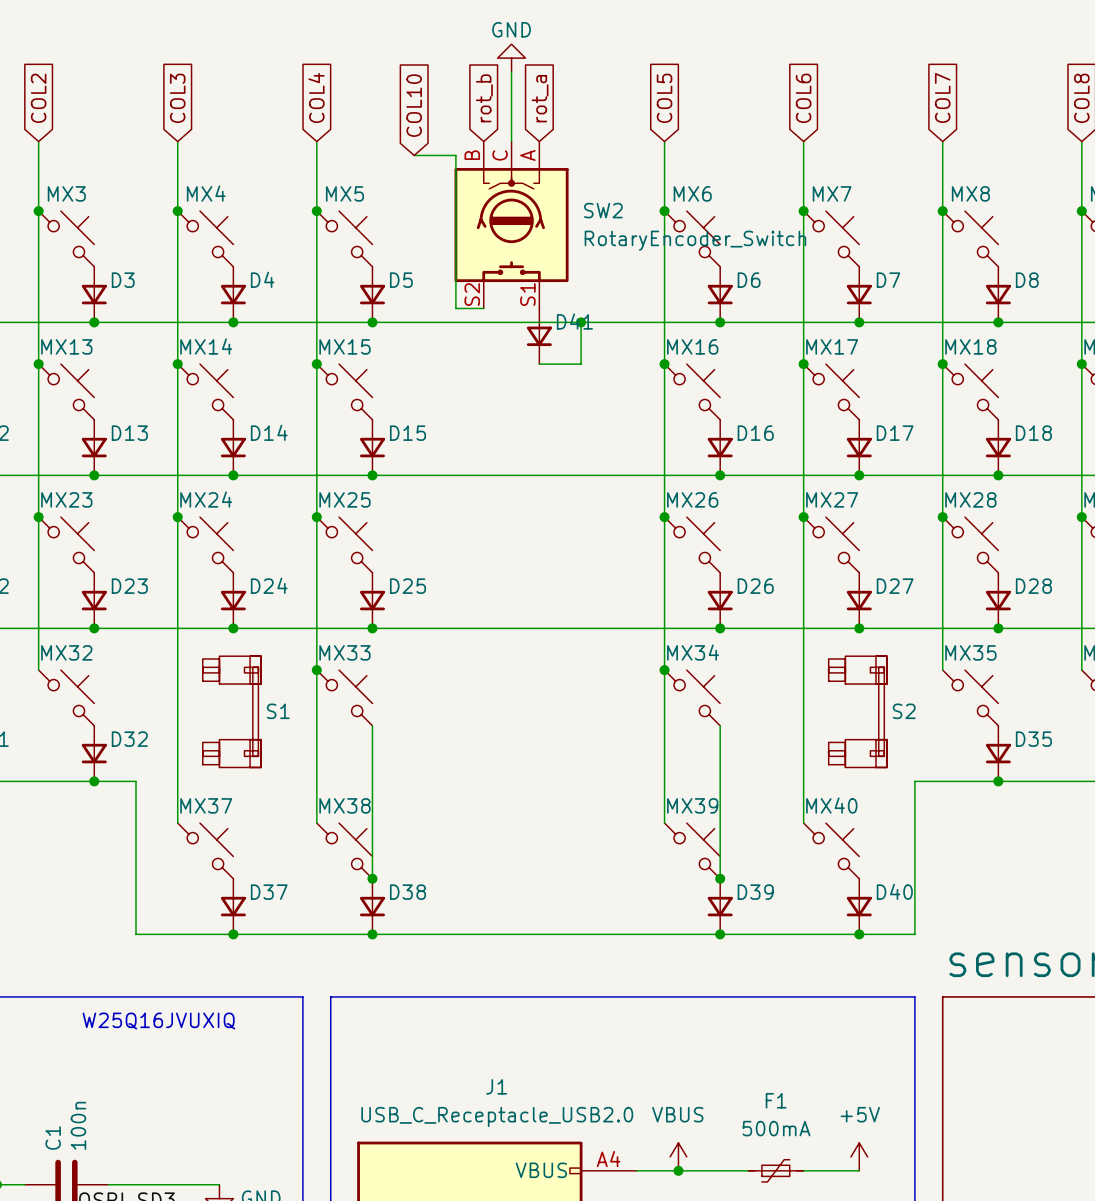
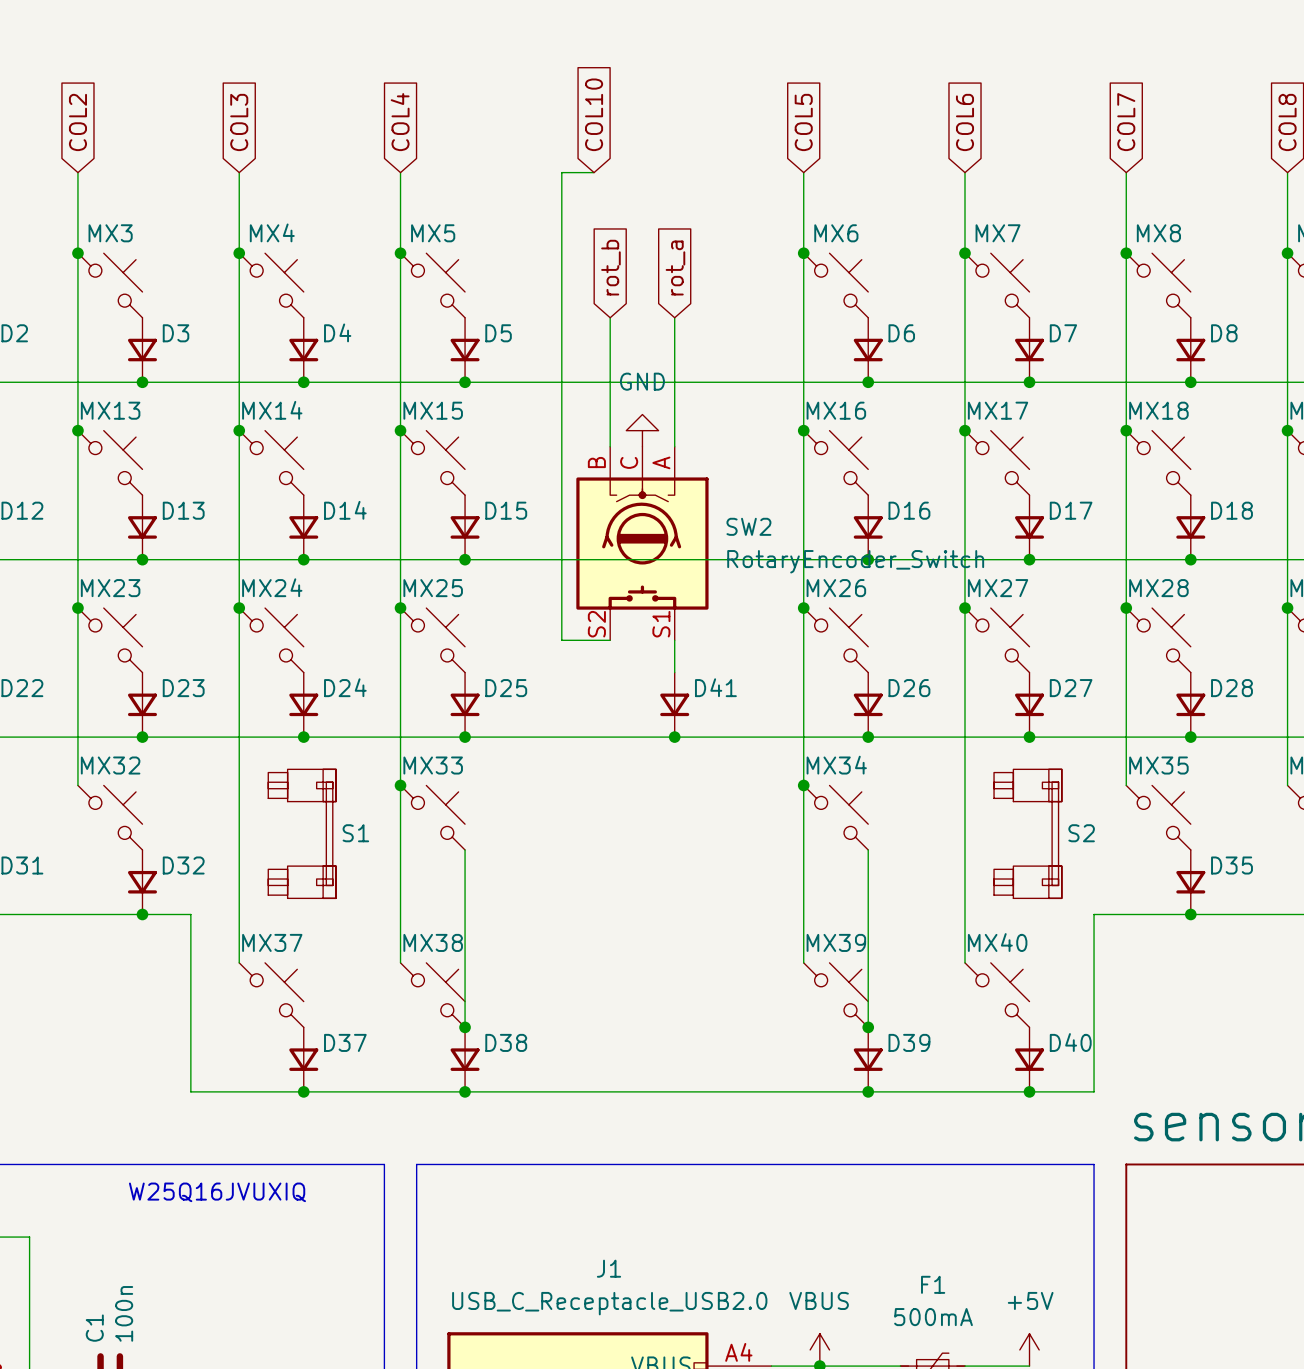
power symbol: GND (511, 58) -> none
wire: (511, 72) (511, 141) -> none
global label: rot_b (484, 98) -> COL10 (594, 114)
global label position: rot_a (540, 98) -> rot_a (675, 268)
global label: COL10 (414, 105) -> none
wire: (414, 155) (455, 155) -> (594, 172) (561, 172) (561, 188)
global label: none -> rot_b (610, 267)
SW2 position: (511, 225) -> (642, 543)
wire: none -> (610, 317) (610, 446)
wire: none -> (674, 317) (674, 446)
wire: (455, 308) (483, 308) -> (561, 366) (561, 640) (610, 640)
wire: (581, 322) (581, 364) (539, 364) -> none
junction: (581, 322) -> none
D41 position: (539, 336) -> (674, 704)
power symbol: none -> GND (642, 430)
wire: none -> (674, 640) (674, 672)
junction: none -> (674, 737)

